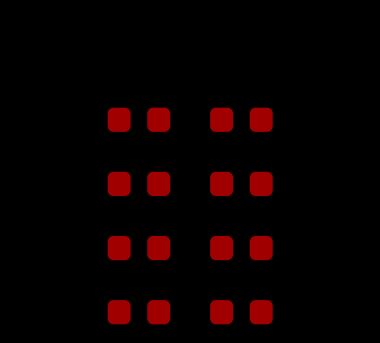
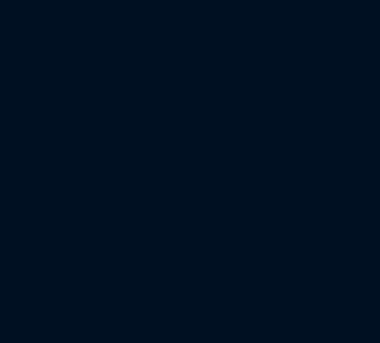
part: (138, 119) -> none
part: (241, 119) -> none
part: (138, 183) -> none
part: (241, 183) -> none
part: (138, 248) -> none
part: (241, 248) -> none
part: (138, 312) -> none
part: (241, 312) -> none

